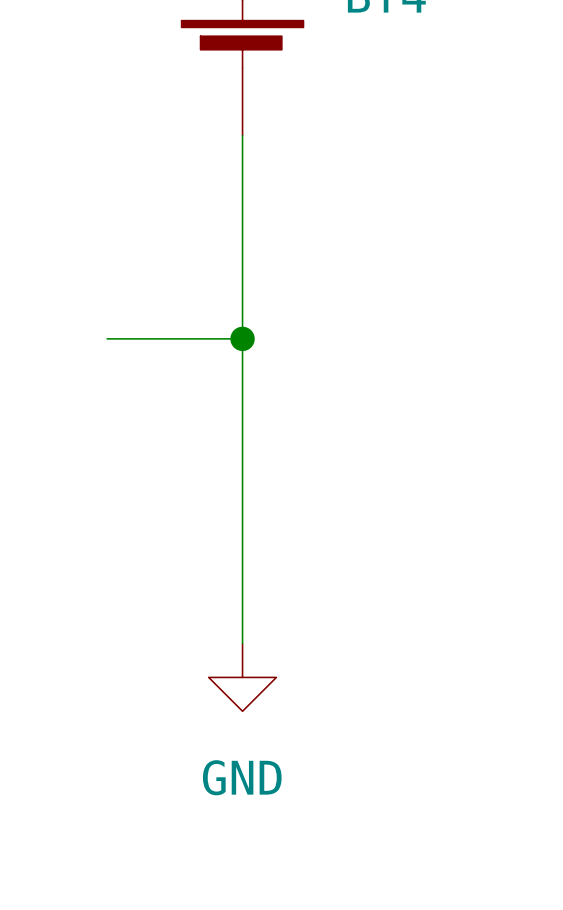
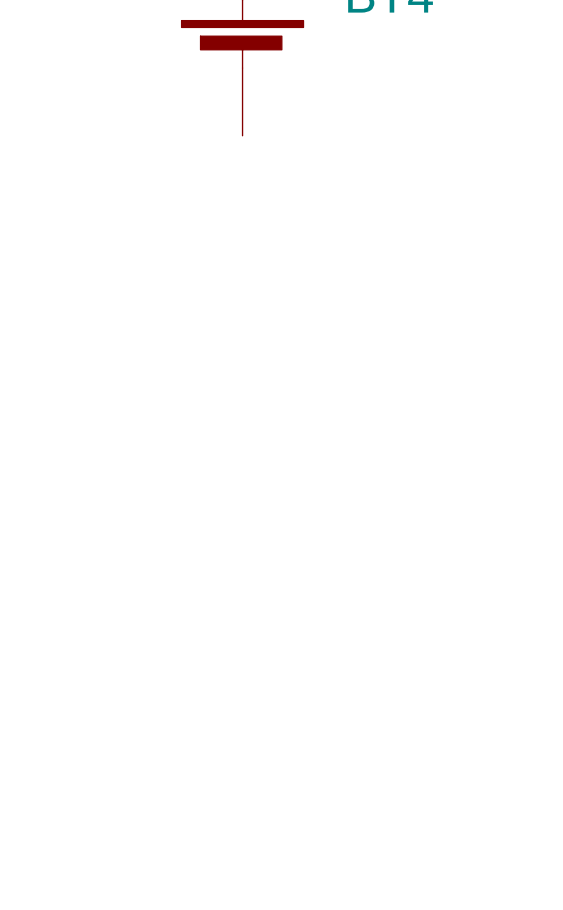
wire: (242, 135) (242, 643) -> none
wire: (107, 338) (242, 338) -> none
junction: (242, 338) -> none
power symbol: GND (242, 677) -> none

